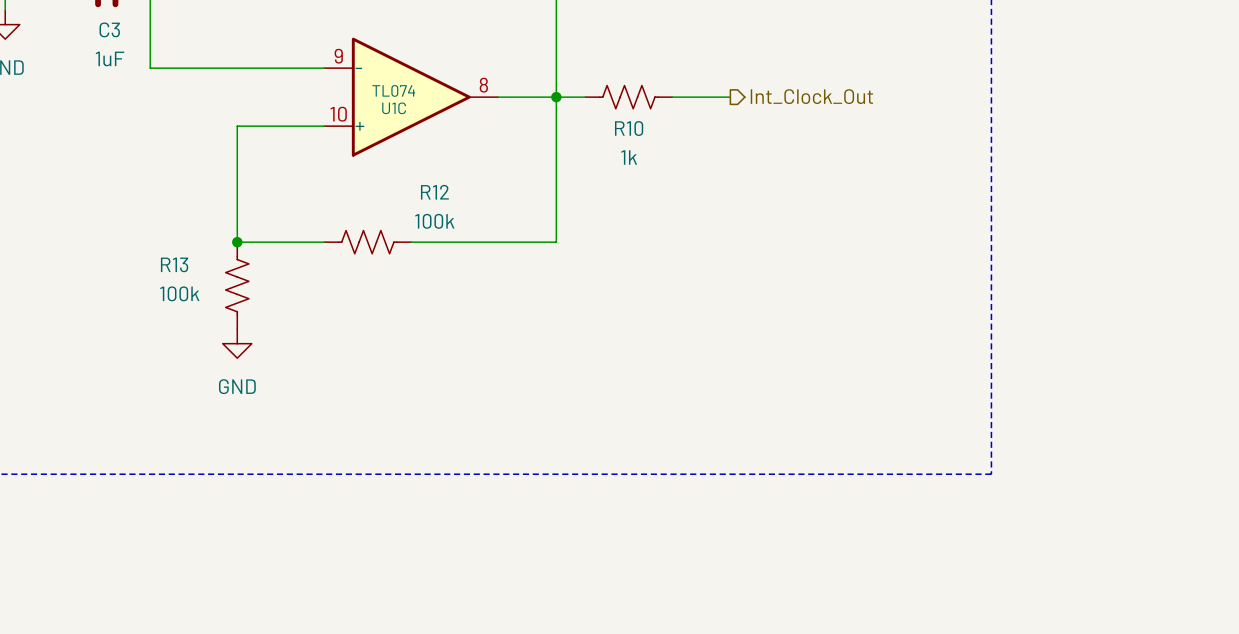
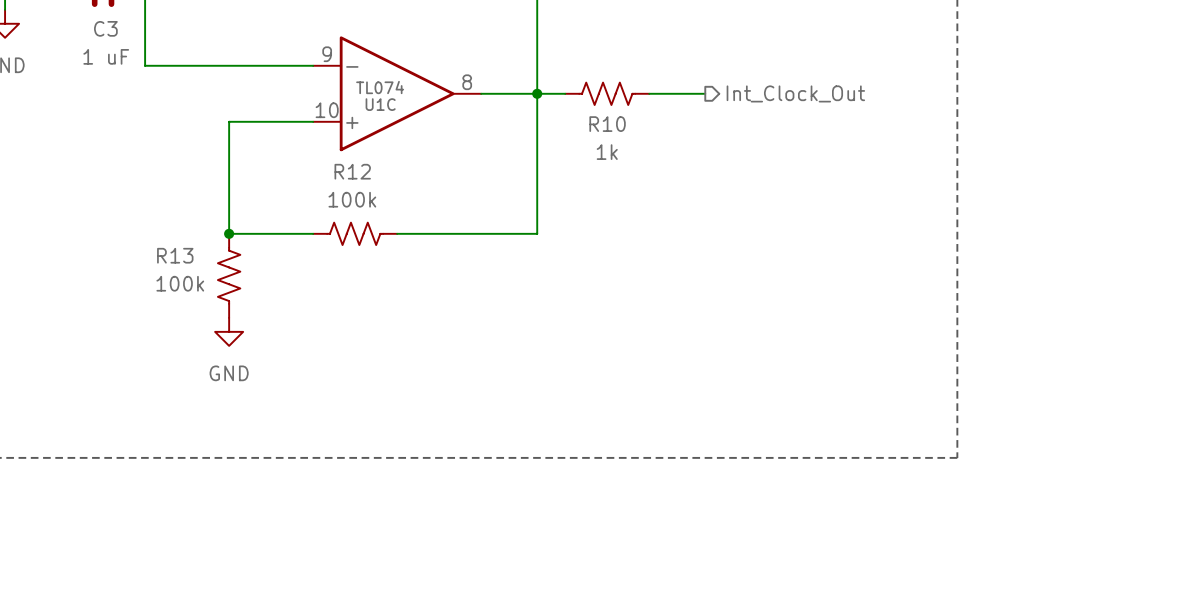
C3 value: 1uF (110, 58) -> 1 uF (106, 56)
R12 name position: R12 (434, 192) -> R12 (352, 171)
R12 value position: 100k (434, 221) -> 100k (352, 199)

